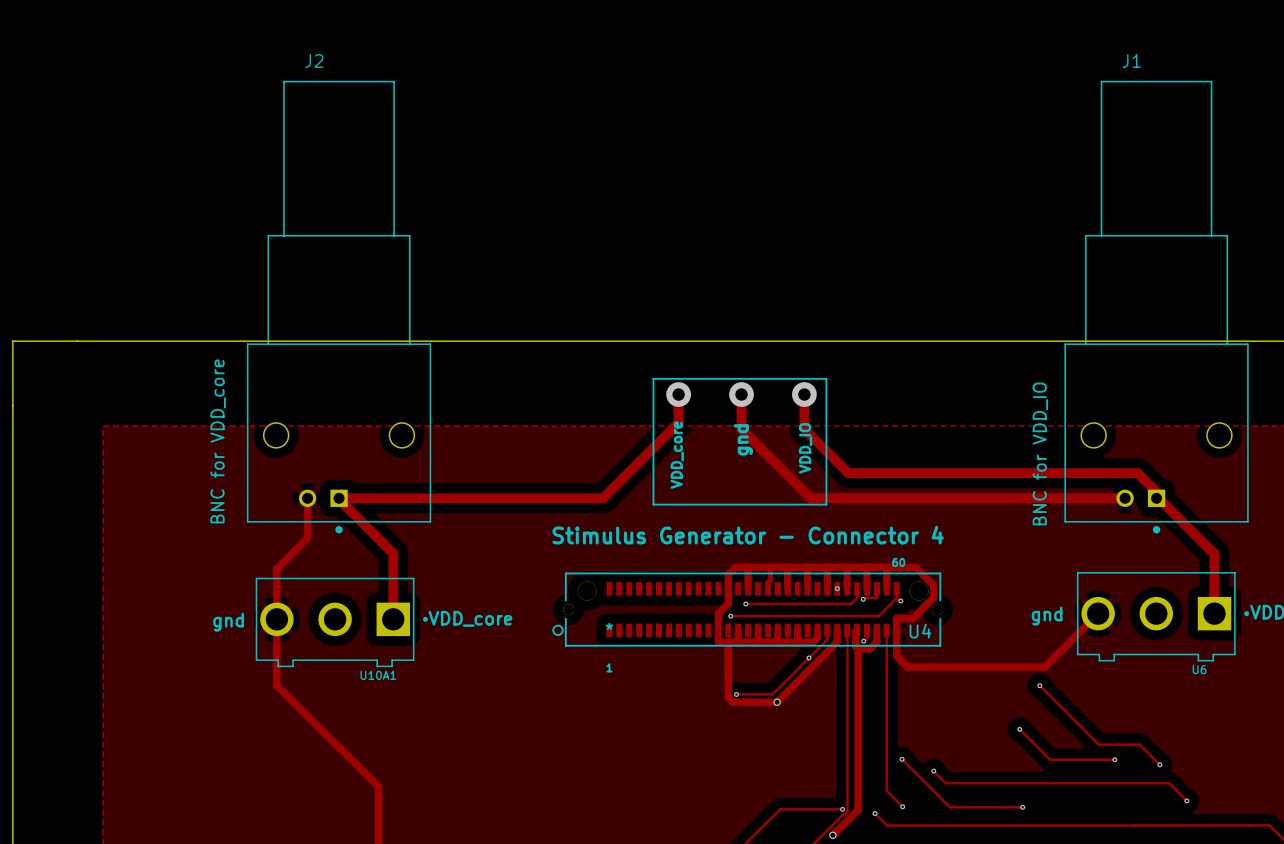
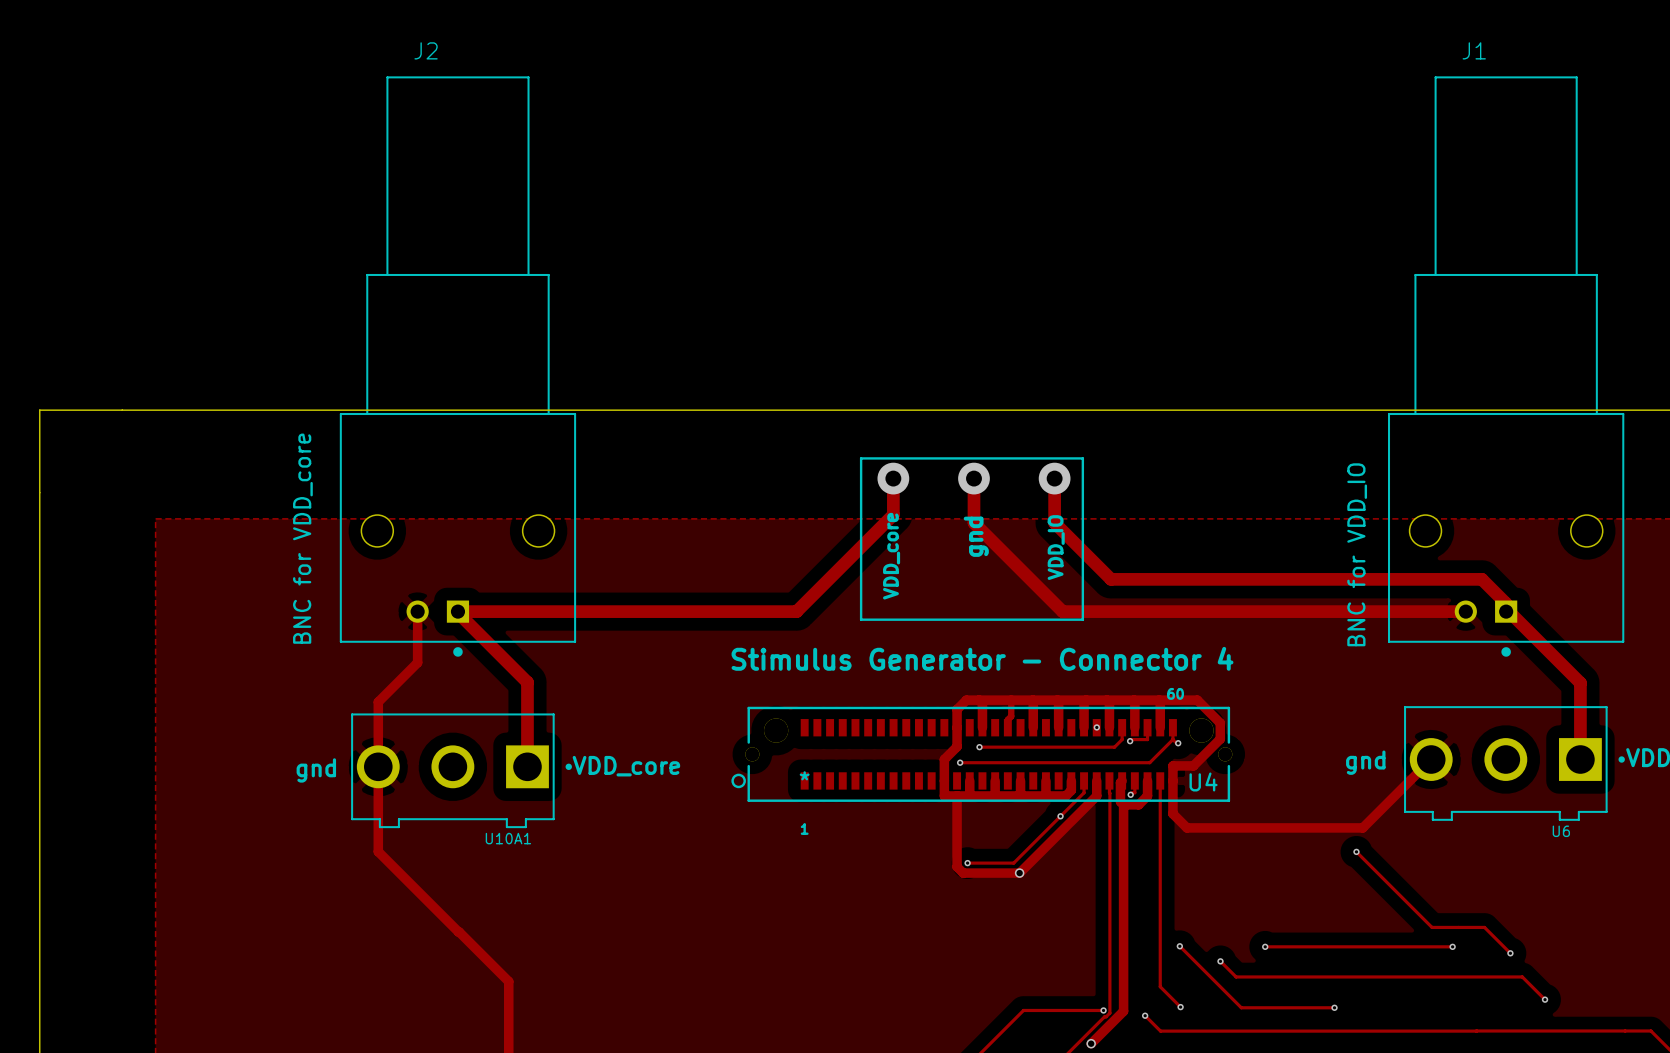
track: (1019, 729) (1050, 759) -> (1265, 946) (1369, 946)
via position: (1019, 729) -> (1265, 946)

